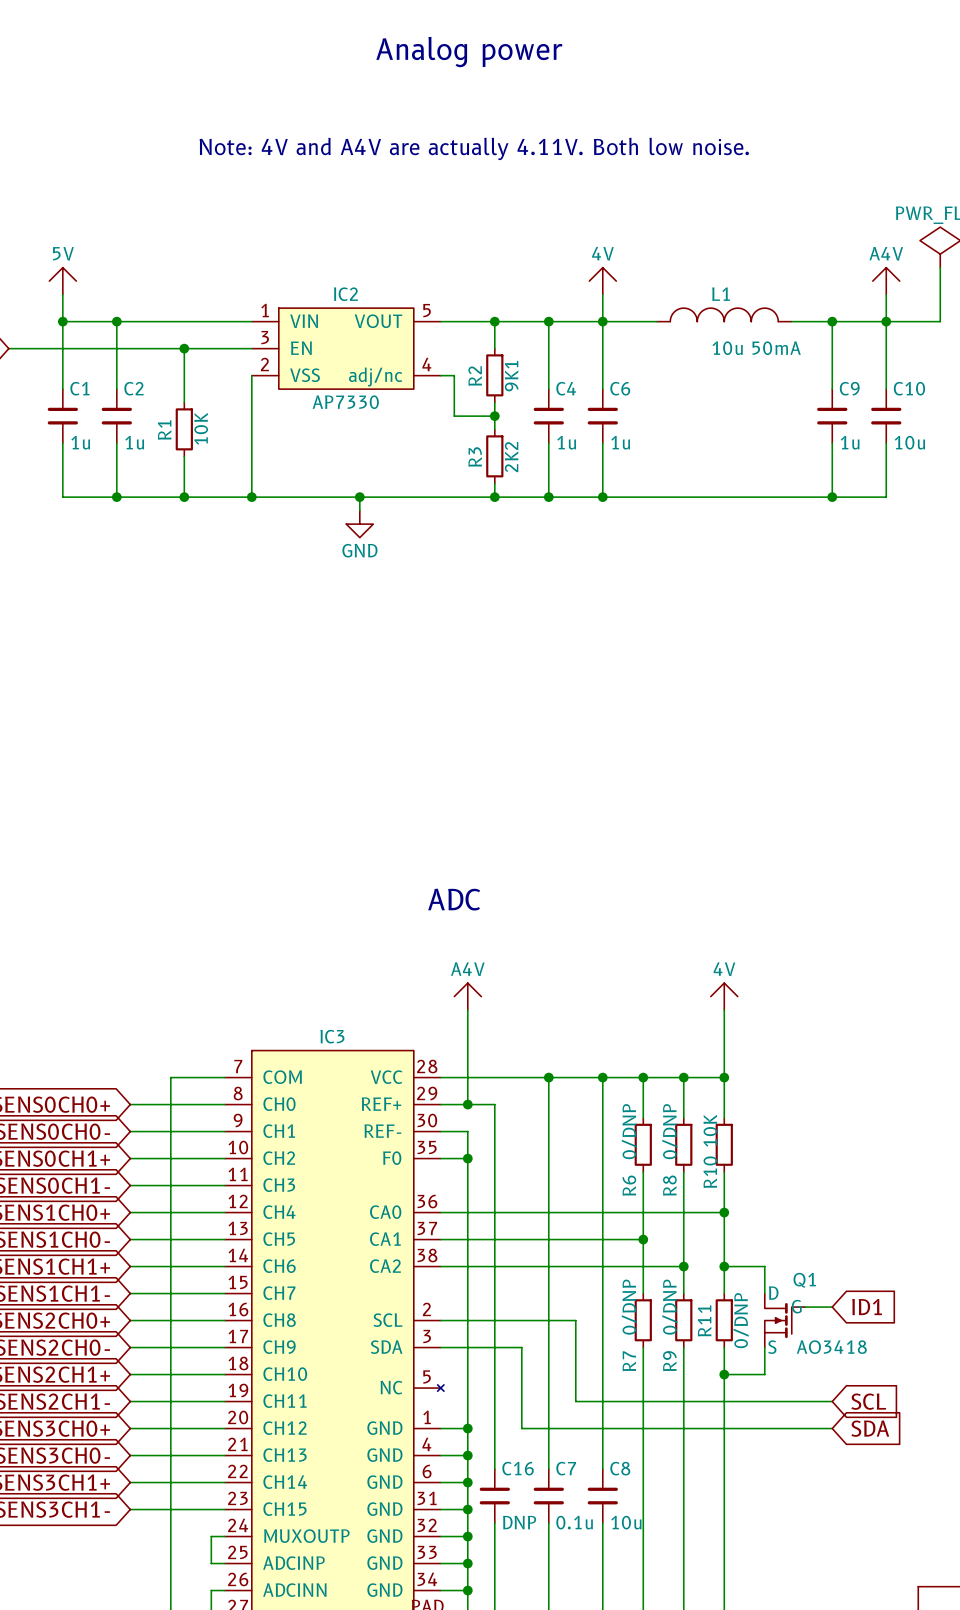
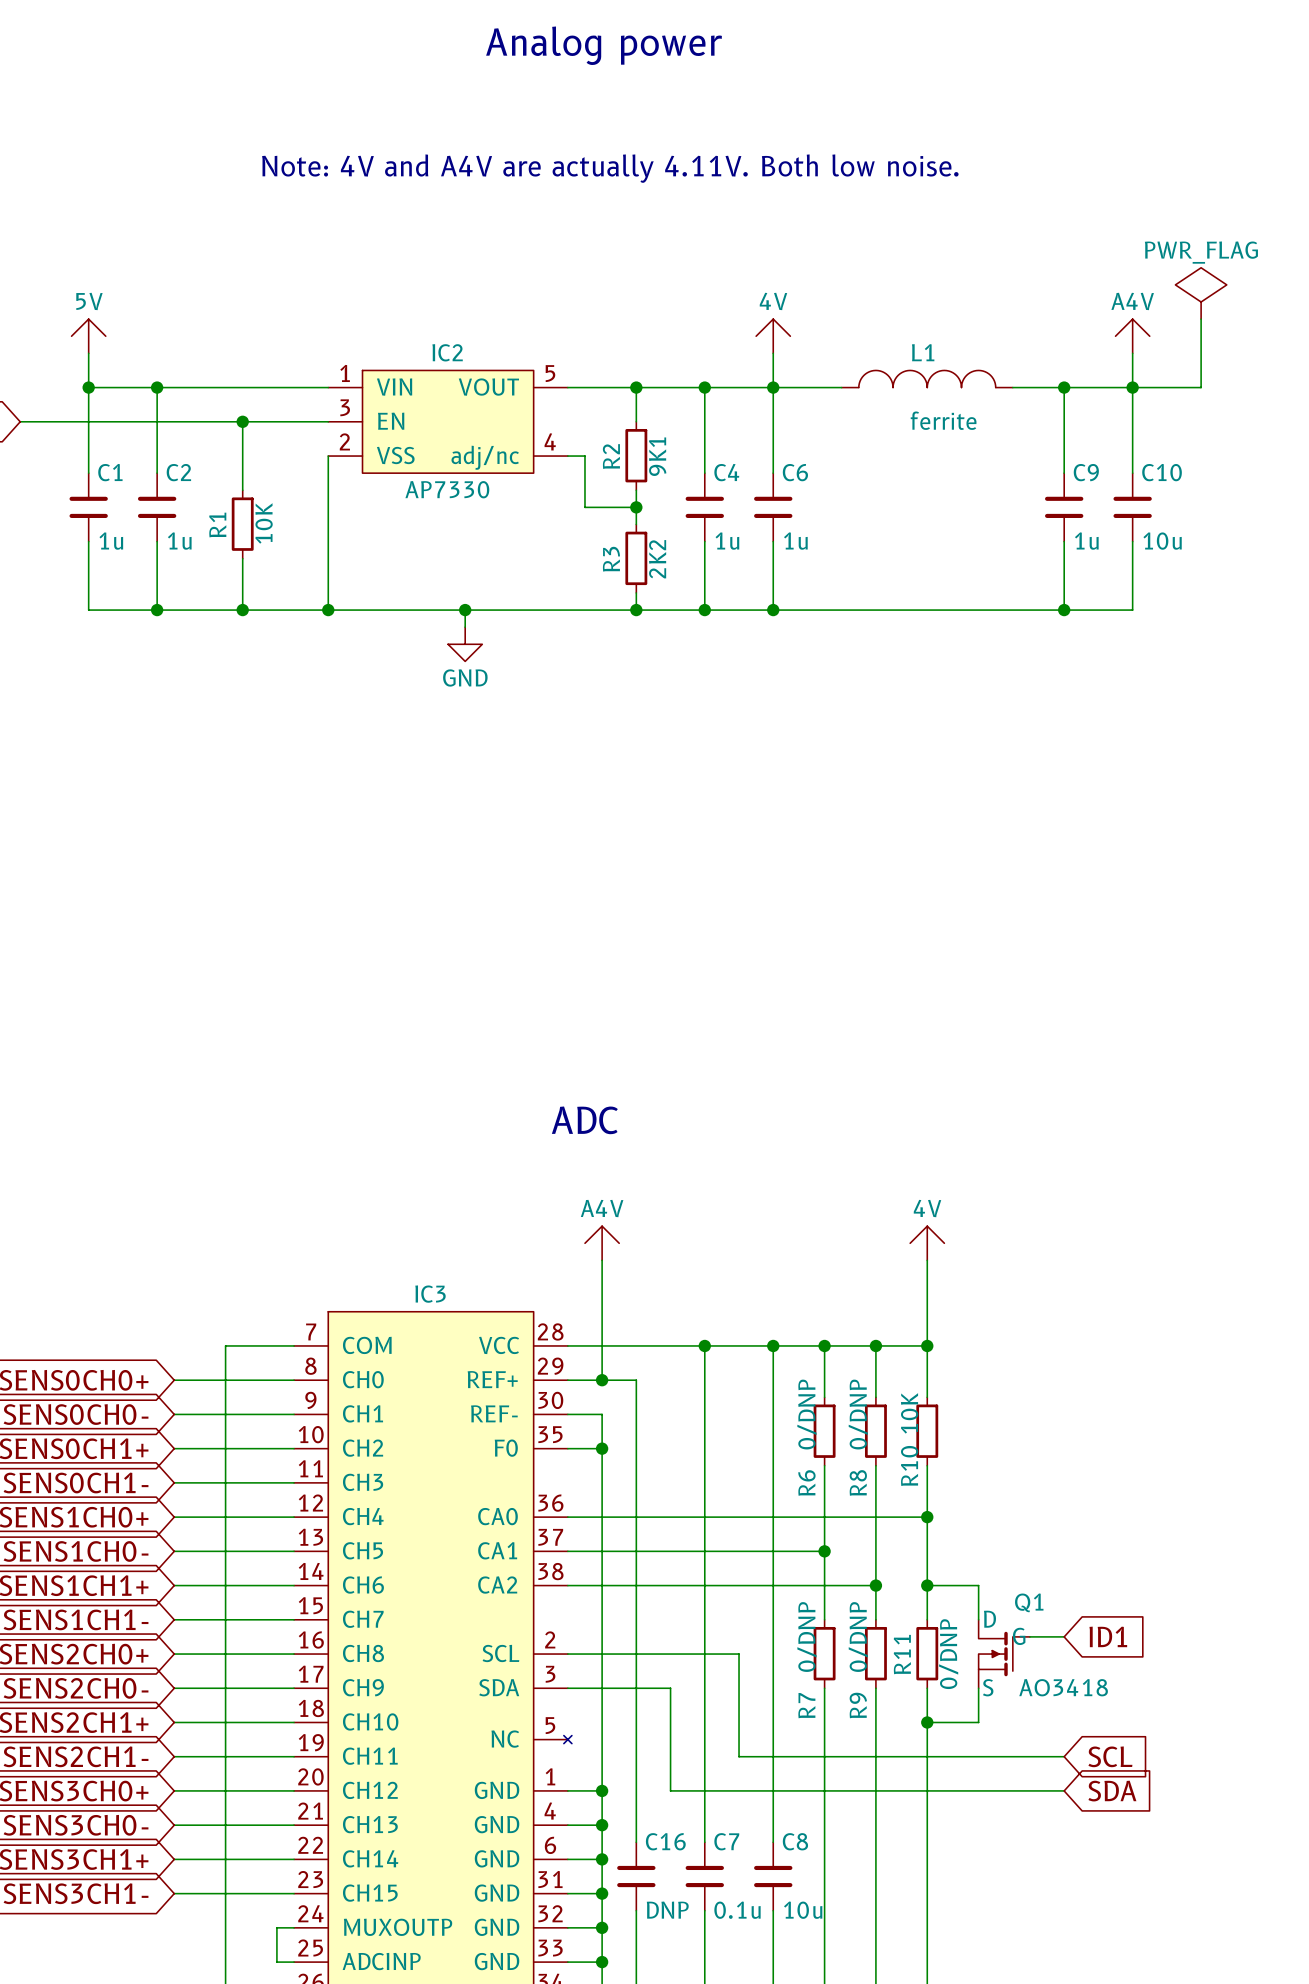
L1 value: 10u 50mA (756, 348) -> ferrite (943, 420)

